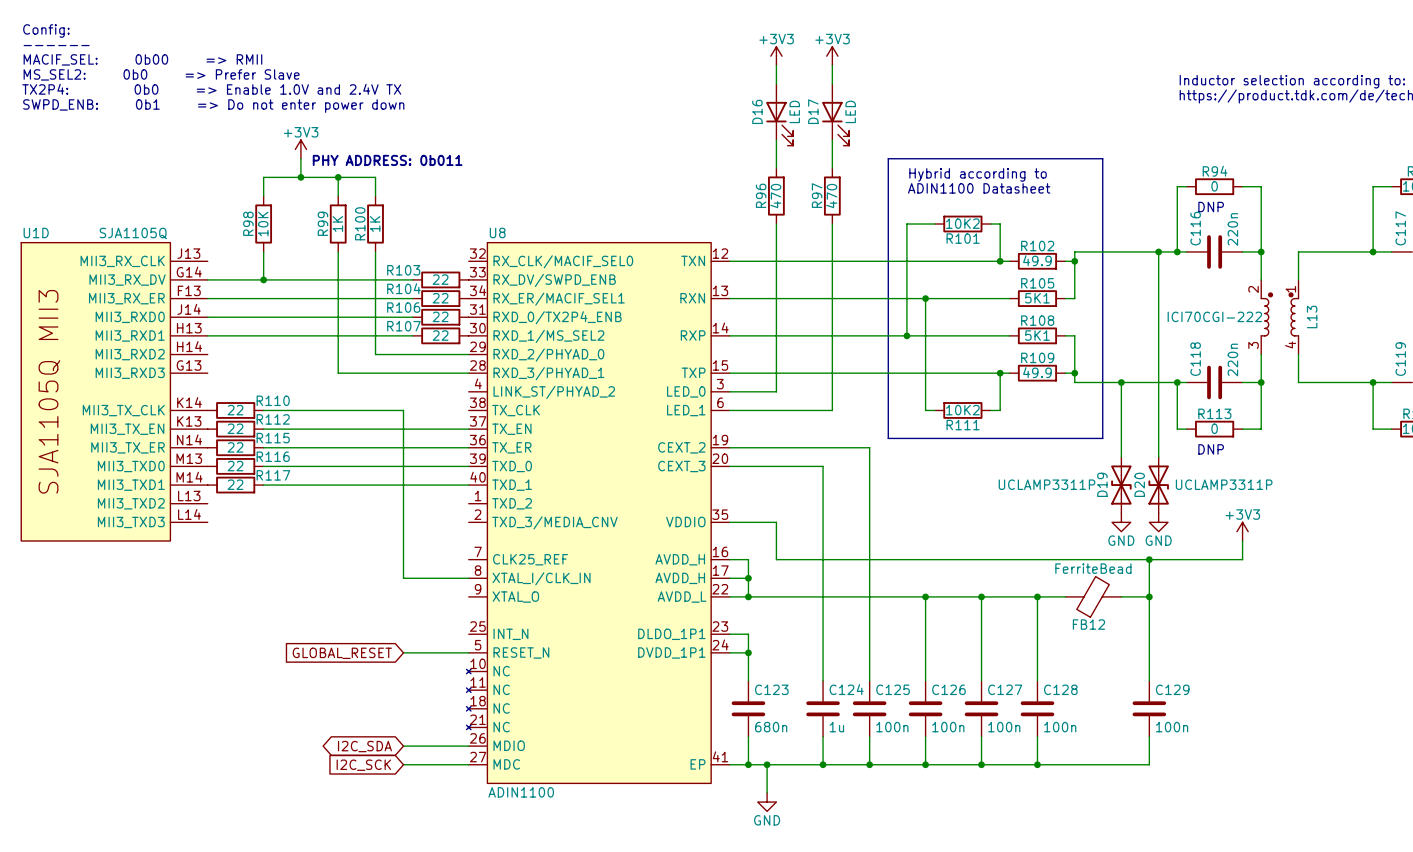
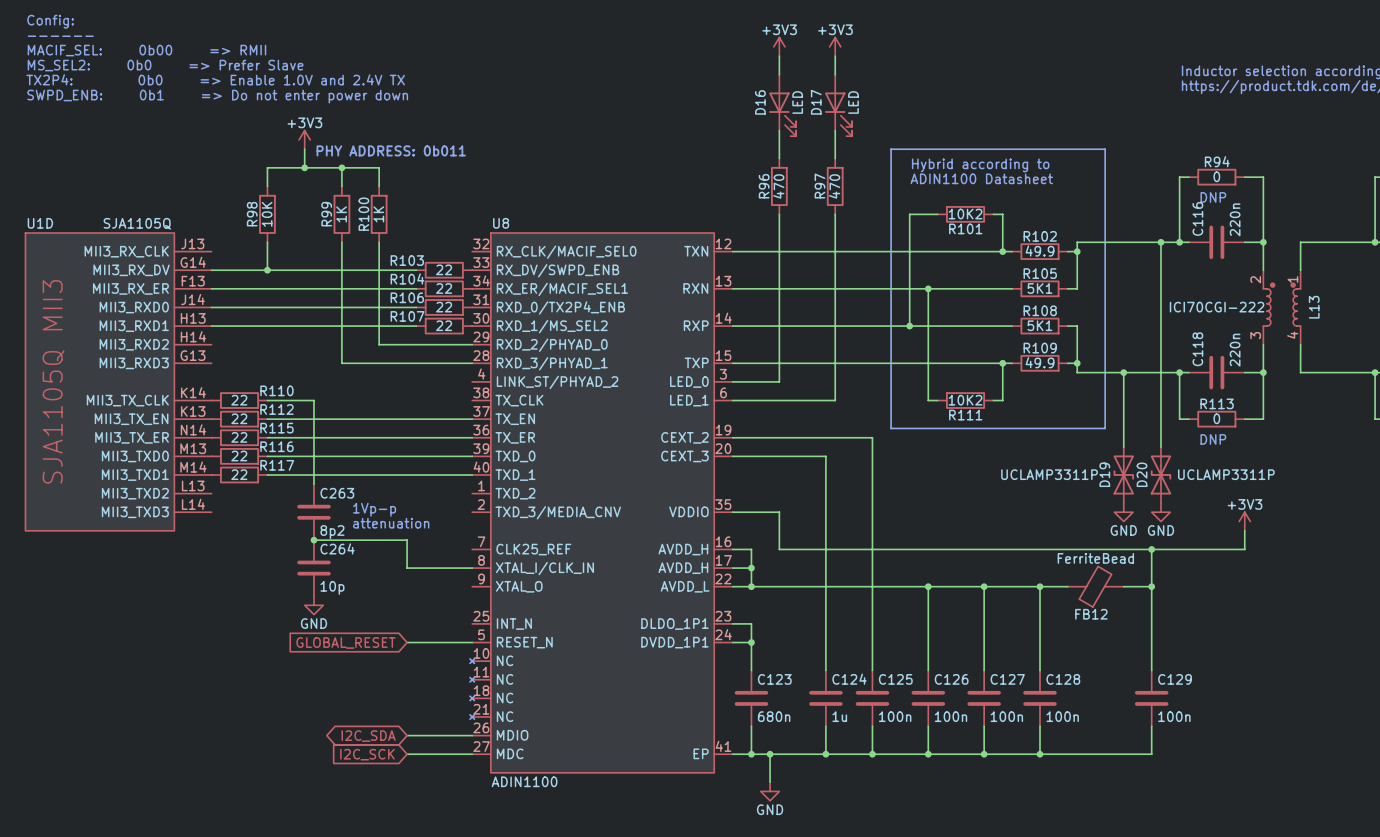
wire: (310, 410) (403, 410) (403, 550) -> (313, 400) (313, 484)
text: none -> 1Vp-p (374, 509)
C263: none -> 8p2 (313, 512)
text: none -> attenuation (391, 523)
wire: none -> (313, 540) (407, 540)
junction: none -> (313, 540)
C264: none -> 10p (313, 568)
power symbol: none -> GND (313, 605)

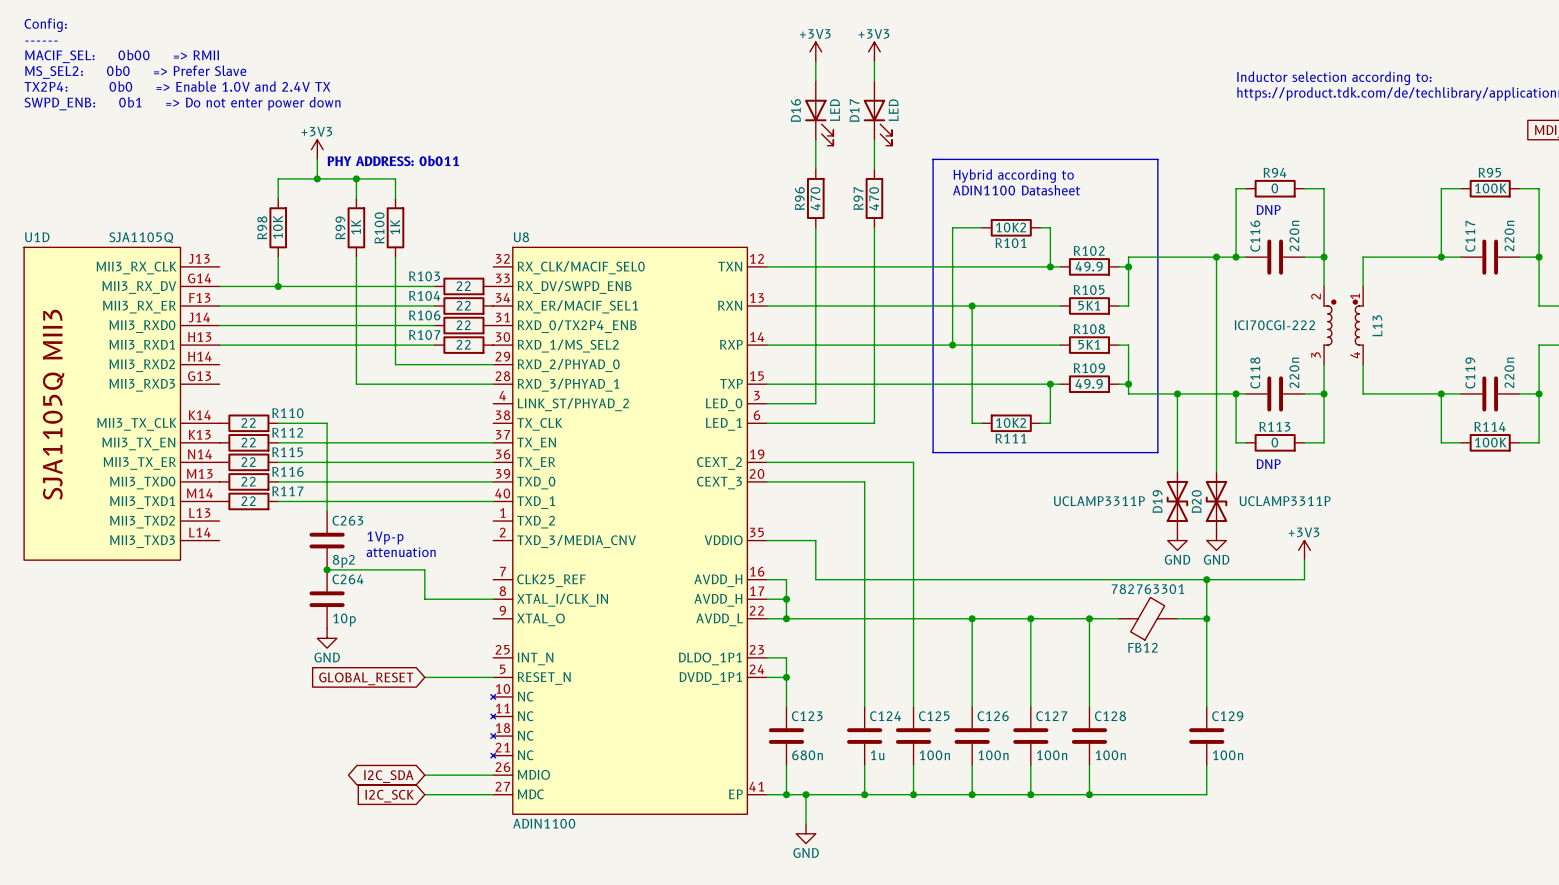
FB12 value: FerriteBead (1095, 558) -> 782763301 (1147, 589)

